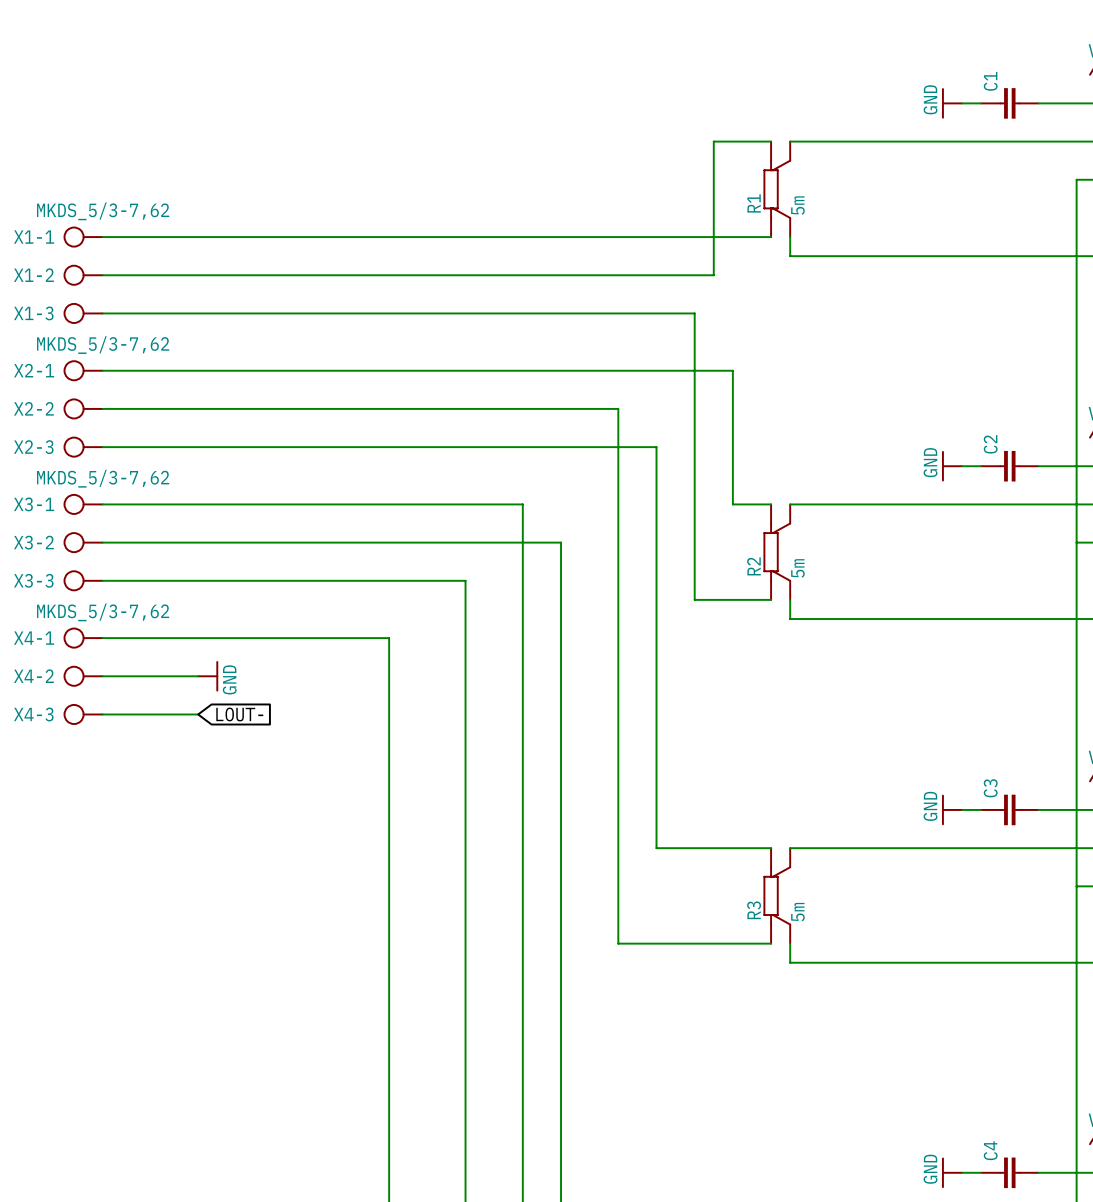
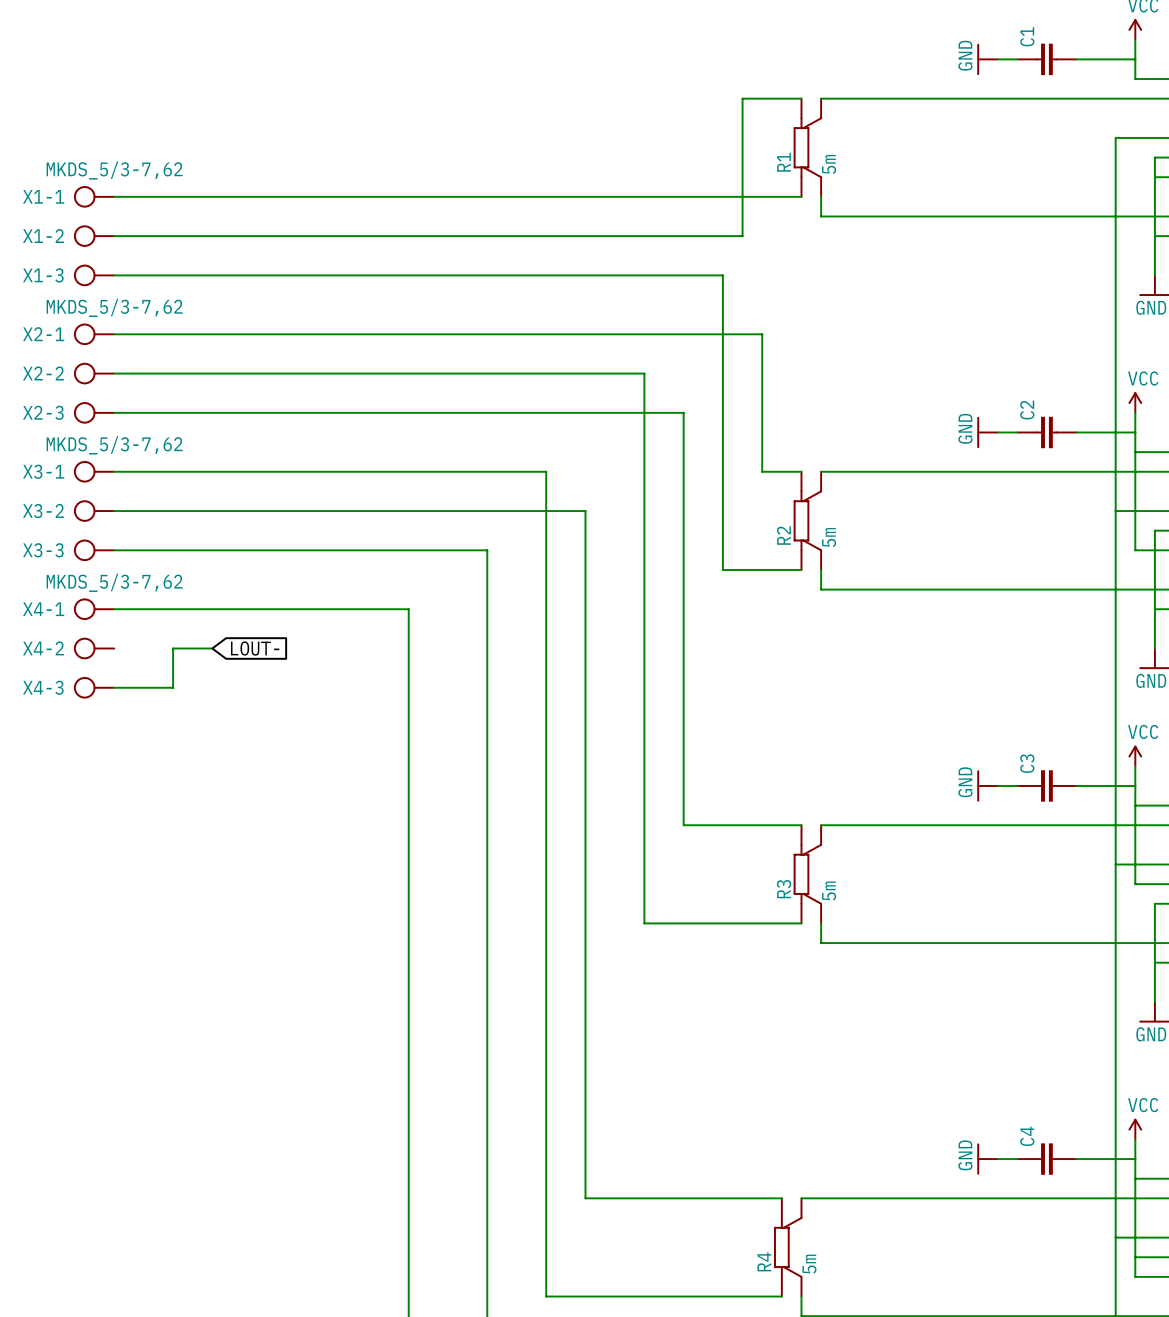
wire: (102, 676) (159, 676) -> none
power symbol: GND (208, 676) -> none
wire: (159, 714) (198, 714) -> (173, 687) (173, 648)
global label position: LOUT- (239, 714) -> LOUT- (255, 648)

